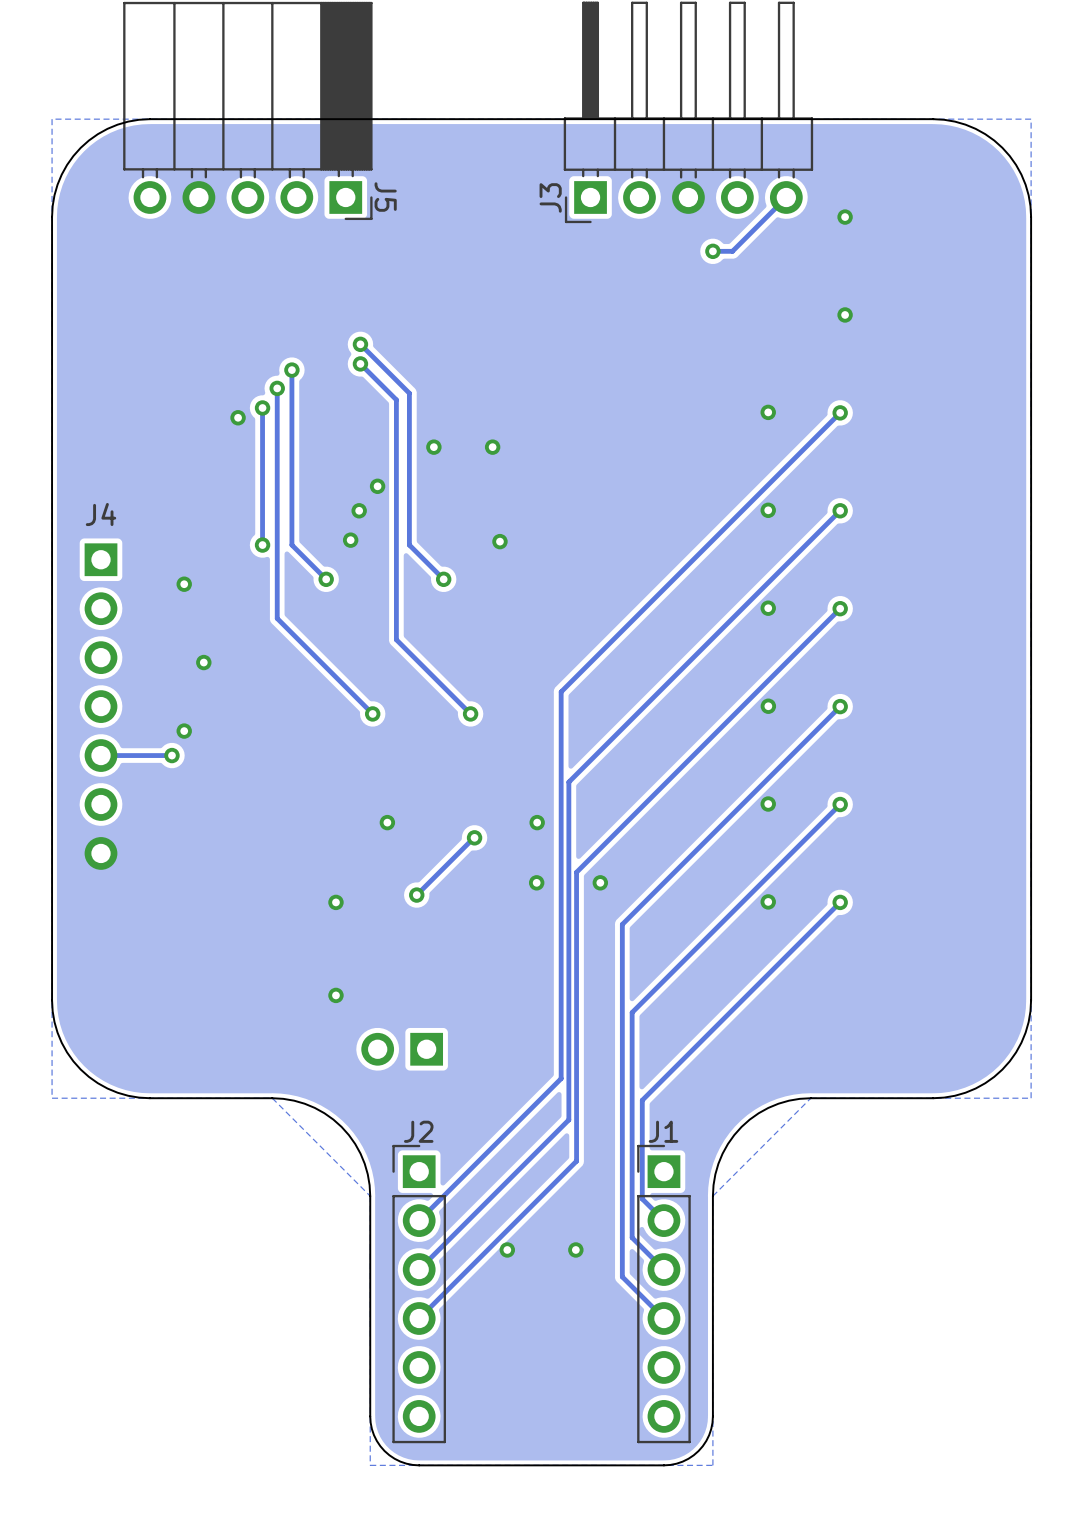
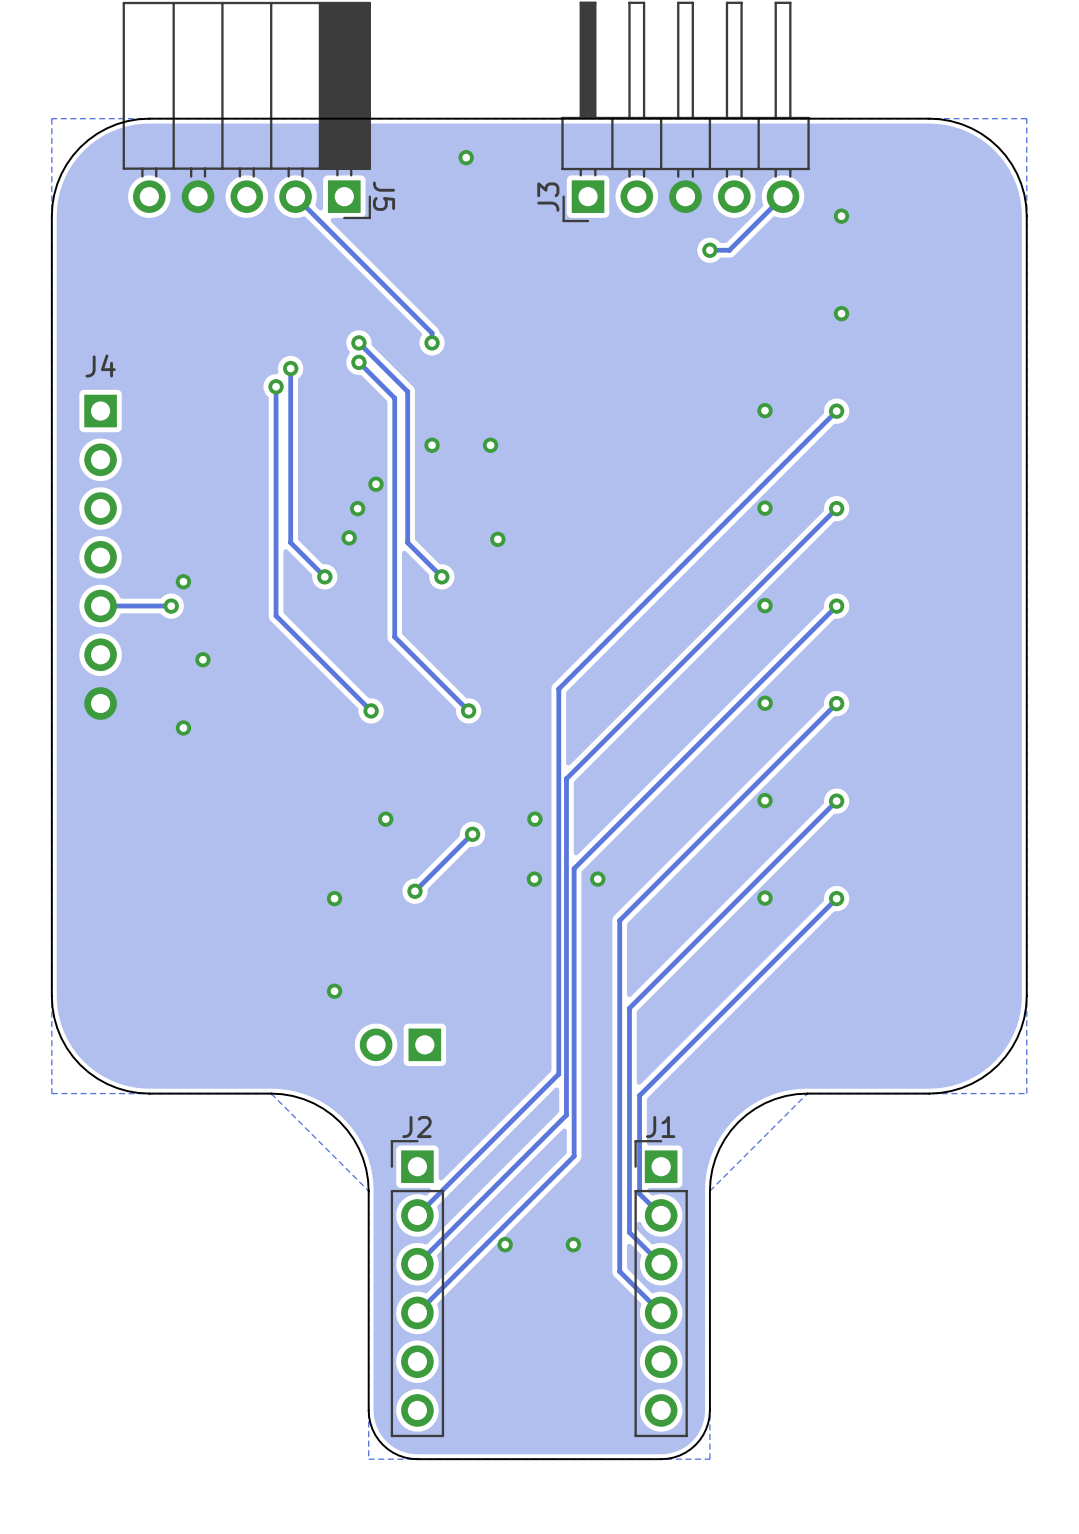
via: none -> (466, 157)
track: none -> (295, 196) (432, 333) (432, 342)
via: none -> (432, 342)
track: (262, 407) (262, 545) -> none
via: (262, 407) -> none
via: (238, 417) -> none
via: (262, 545) -> none
via: none -> (171, 606)
J4 position: (101, 706) -> (100, 557)
track: (171, 755) (101, 755) -> (171, 606) (100, 606)
via: (171, 755) -> none

